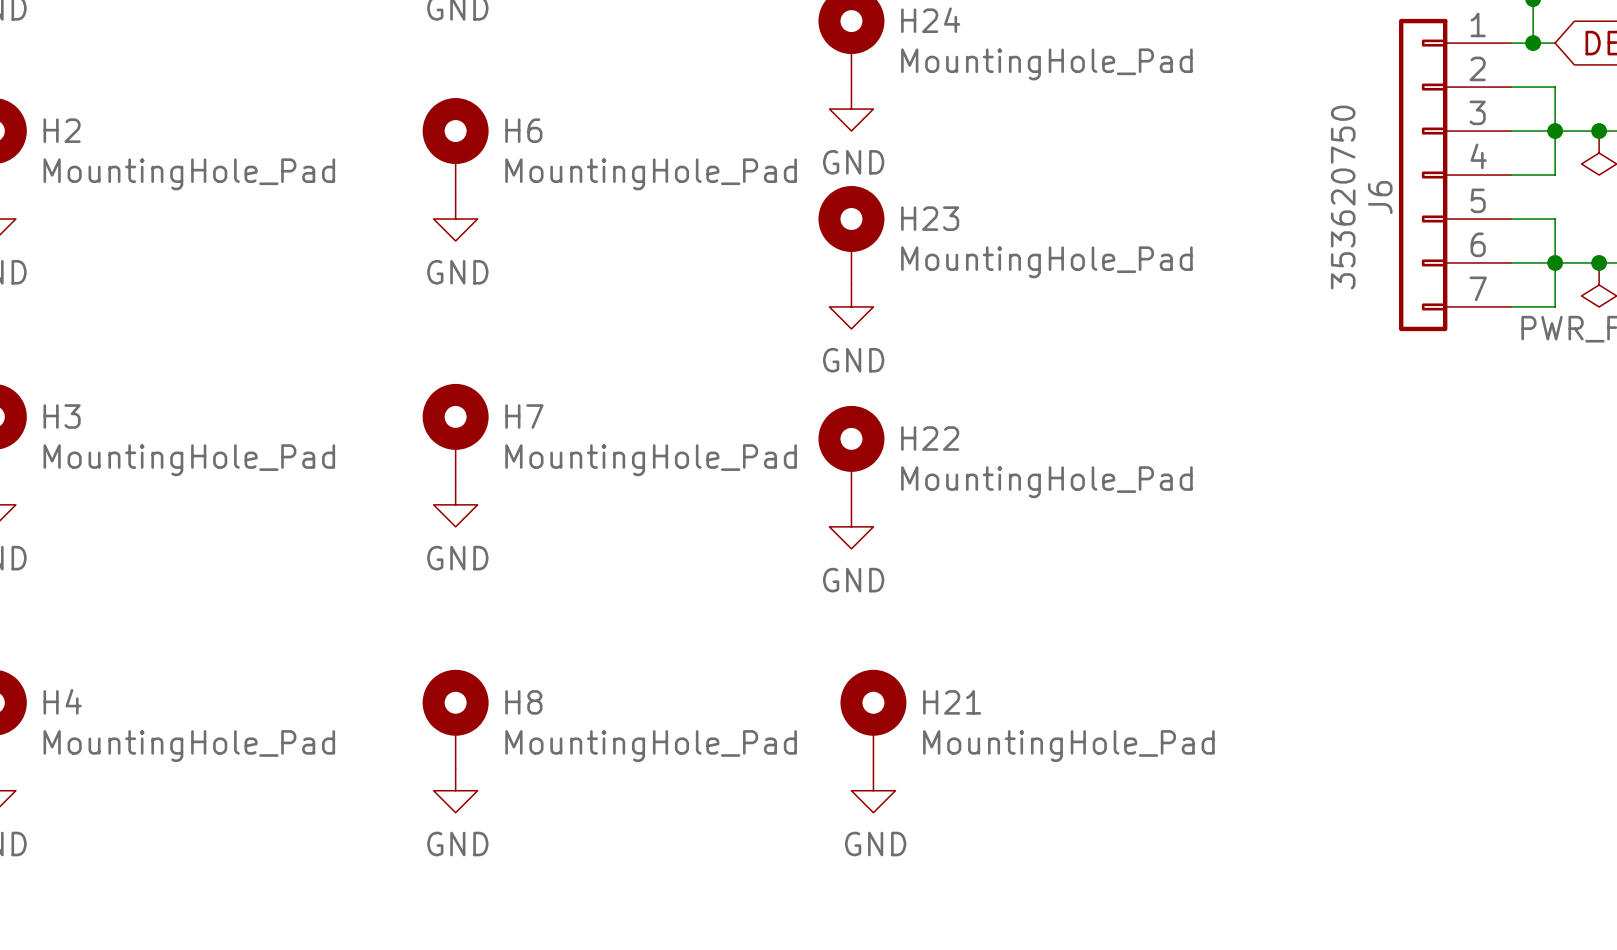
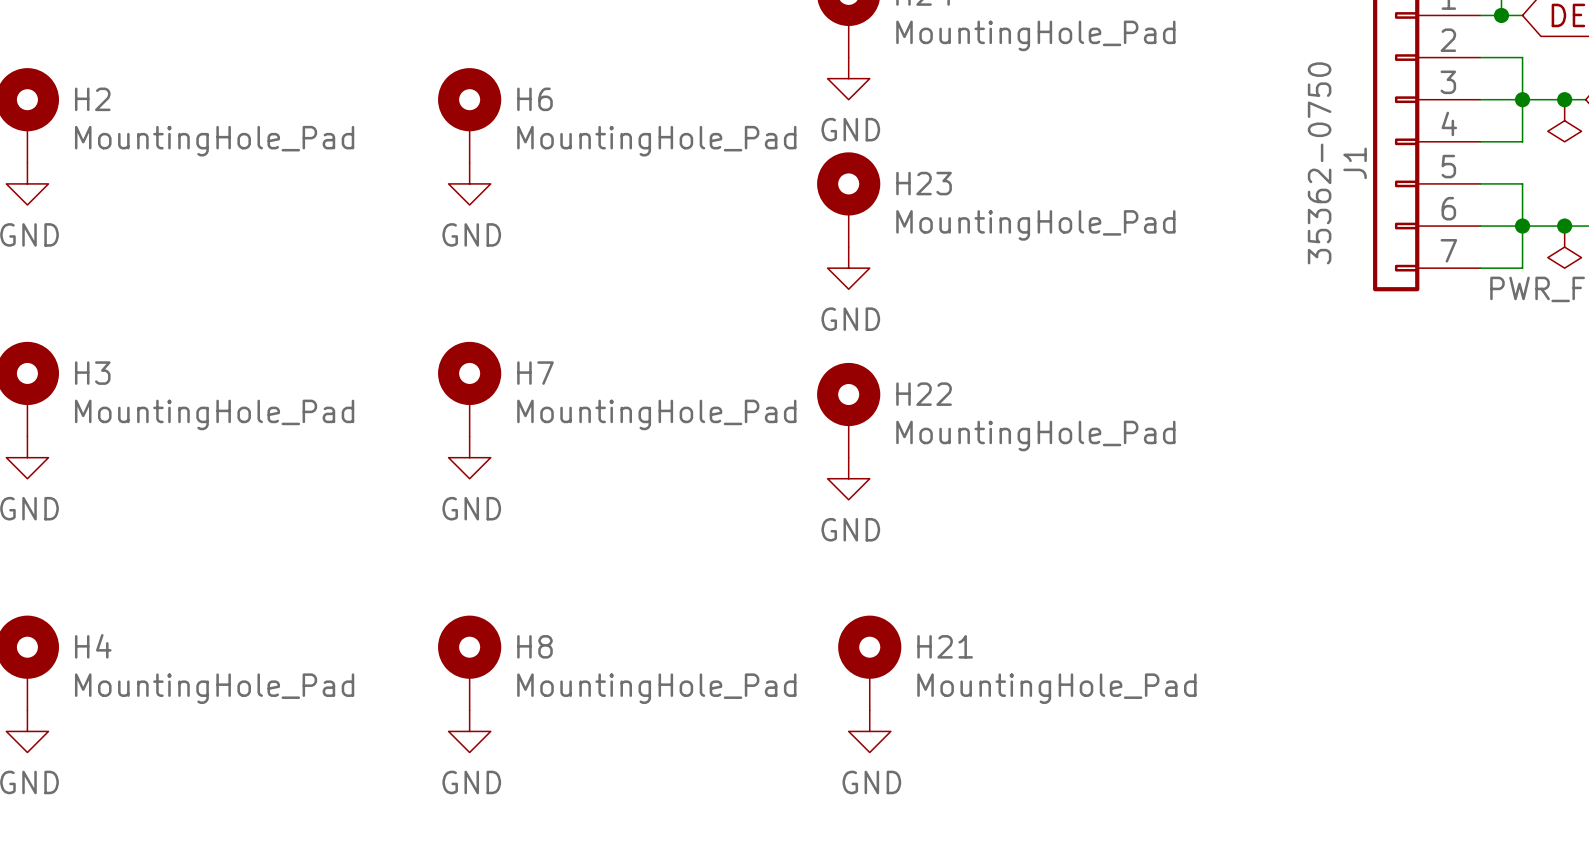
J6 value: 353620750 (1343, 197) -> 35362-0750 (1319, 163)
J6 name: J6 (1380, 197) -> J1 (1355, 163)

